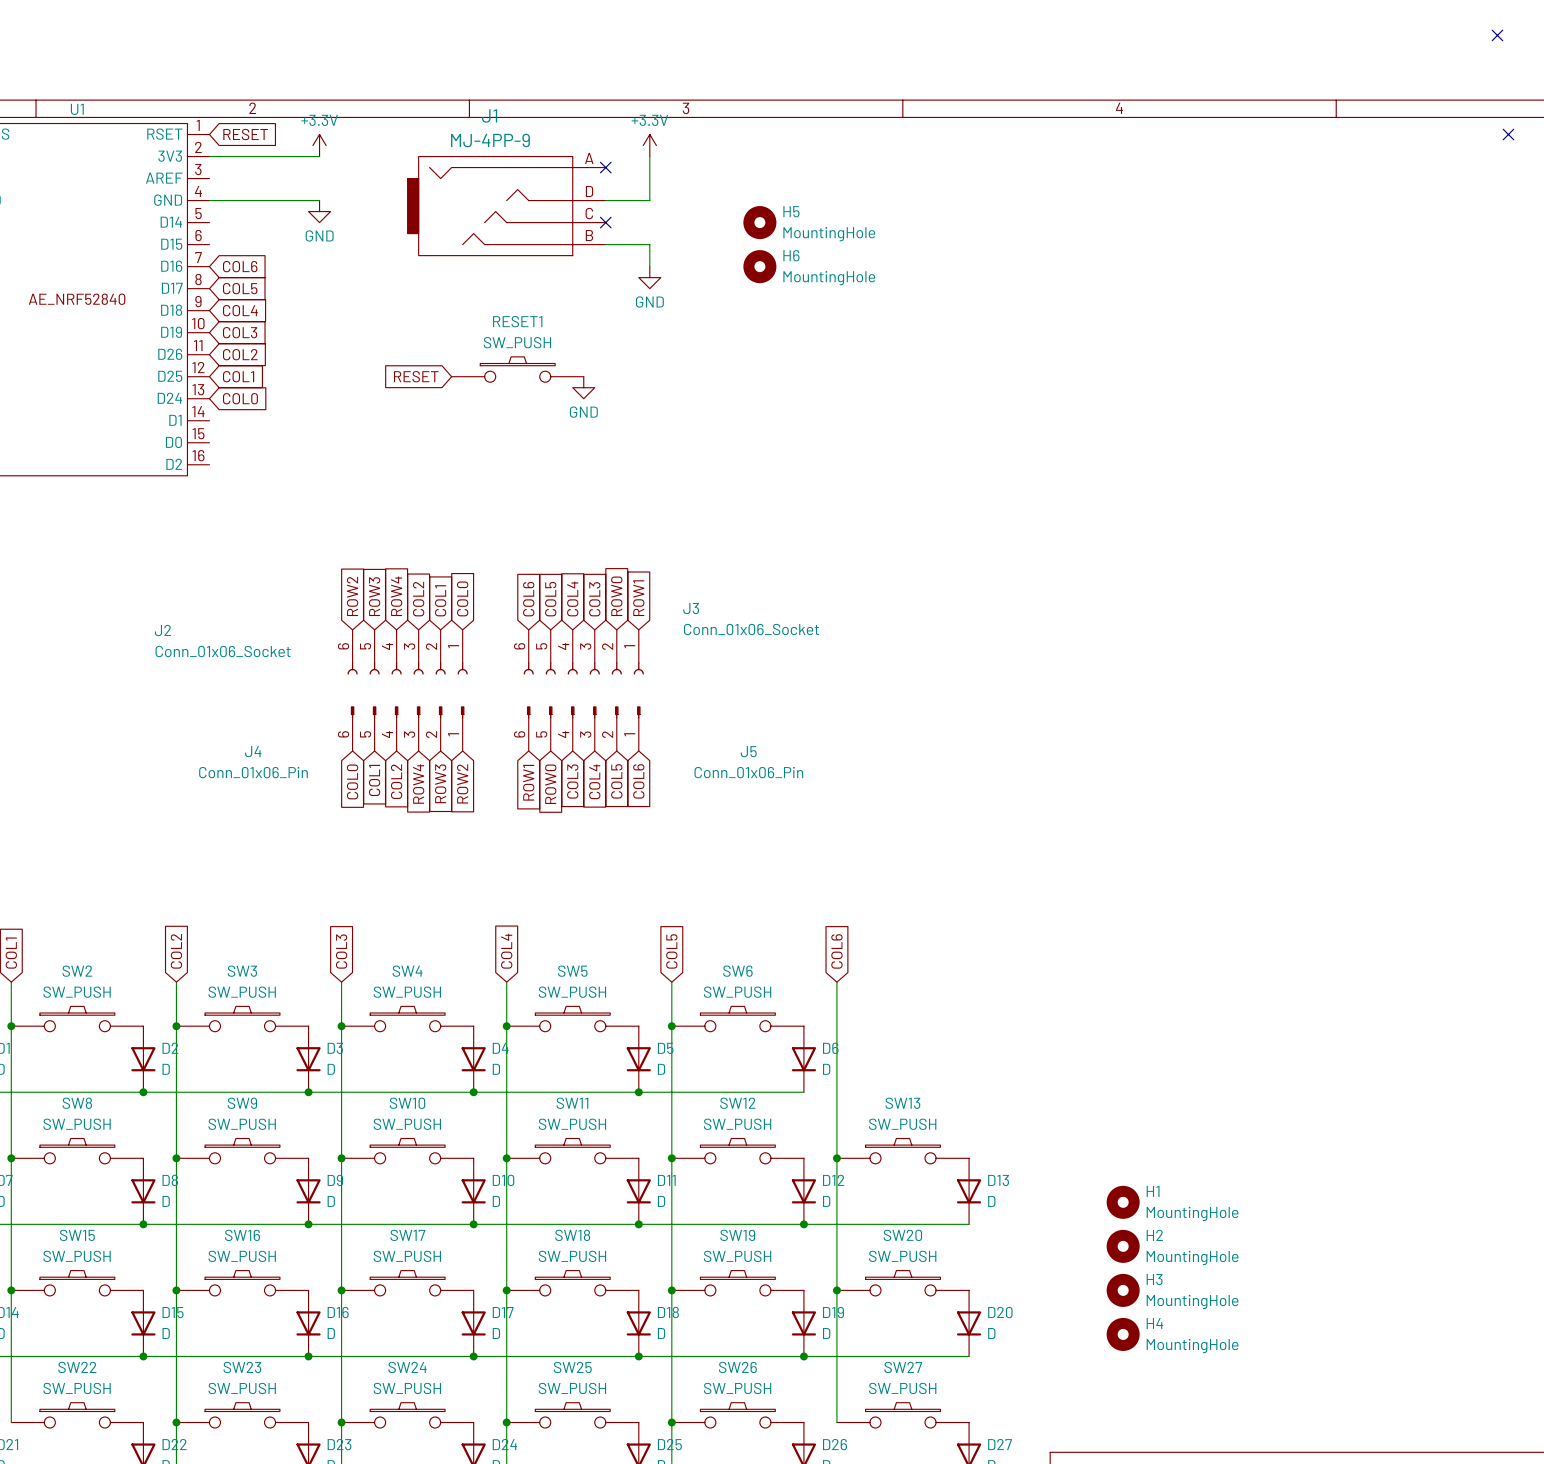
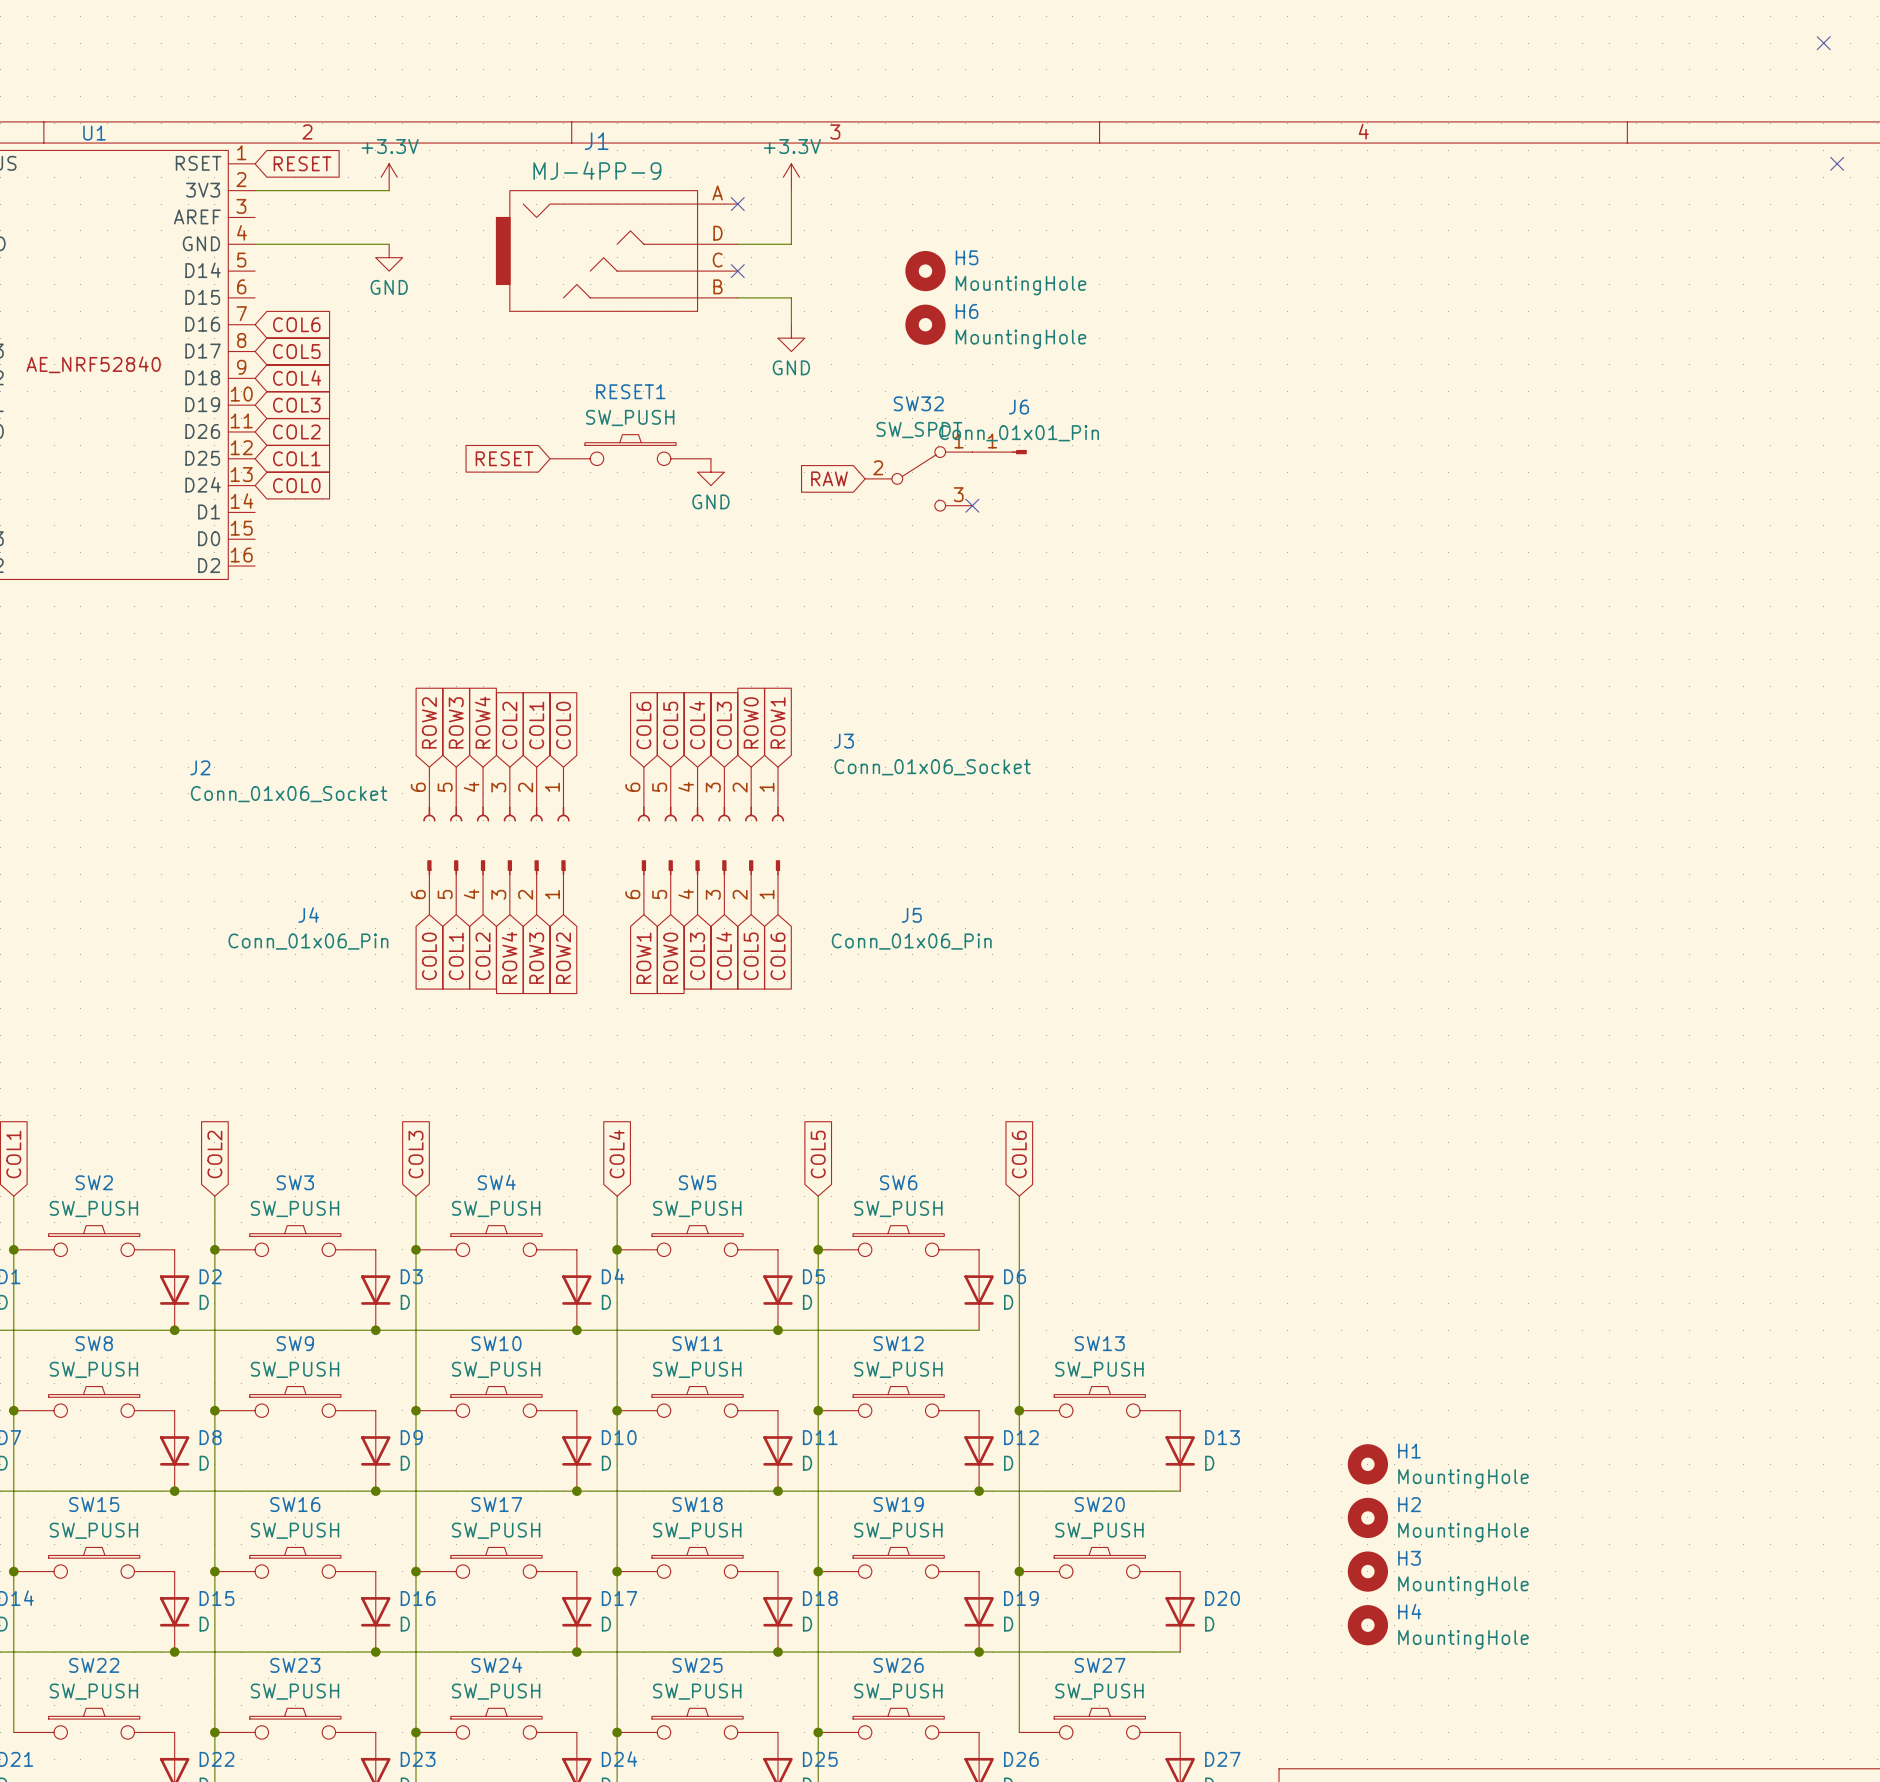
J6: none -> Conn_01x01_Pin (999, 452)
global label: none -> RAW (829, 478)
SW32: none -> SW_SPDT (918, 478)
no-connect mark: none -> (972, 505)

